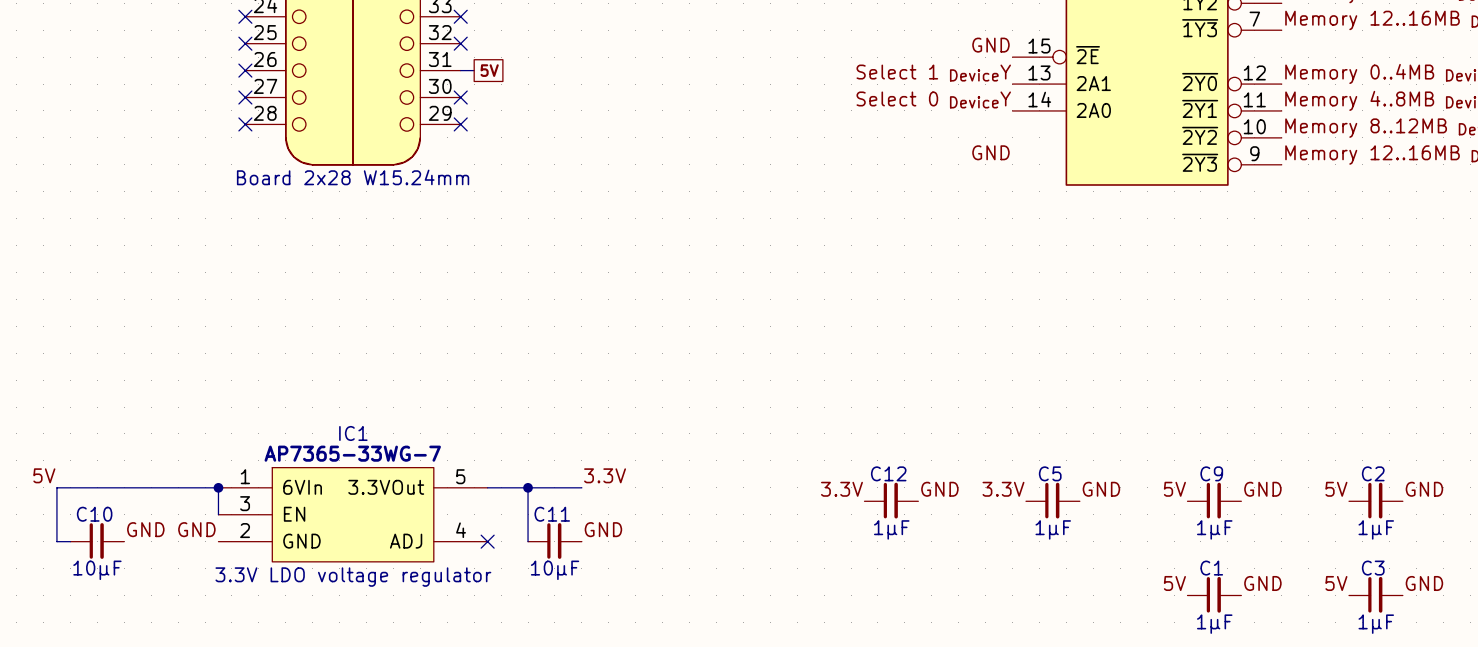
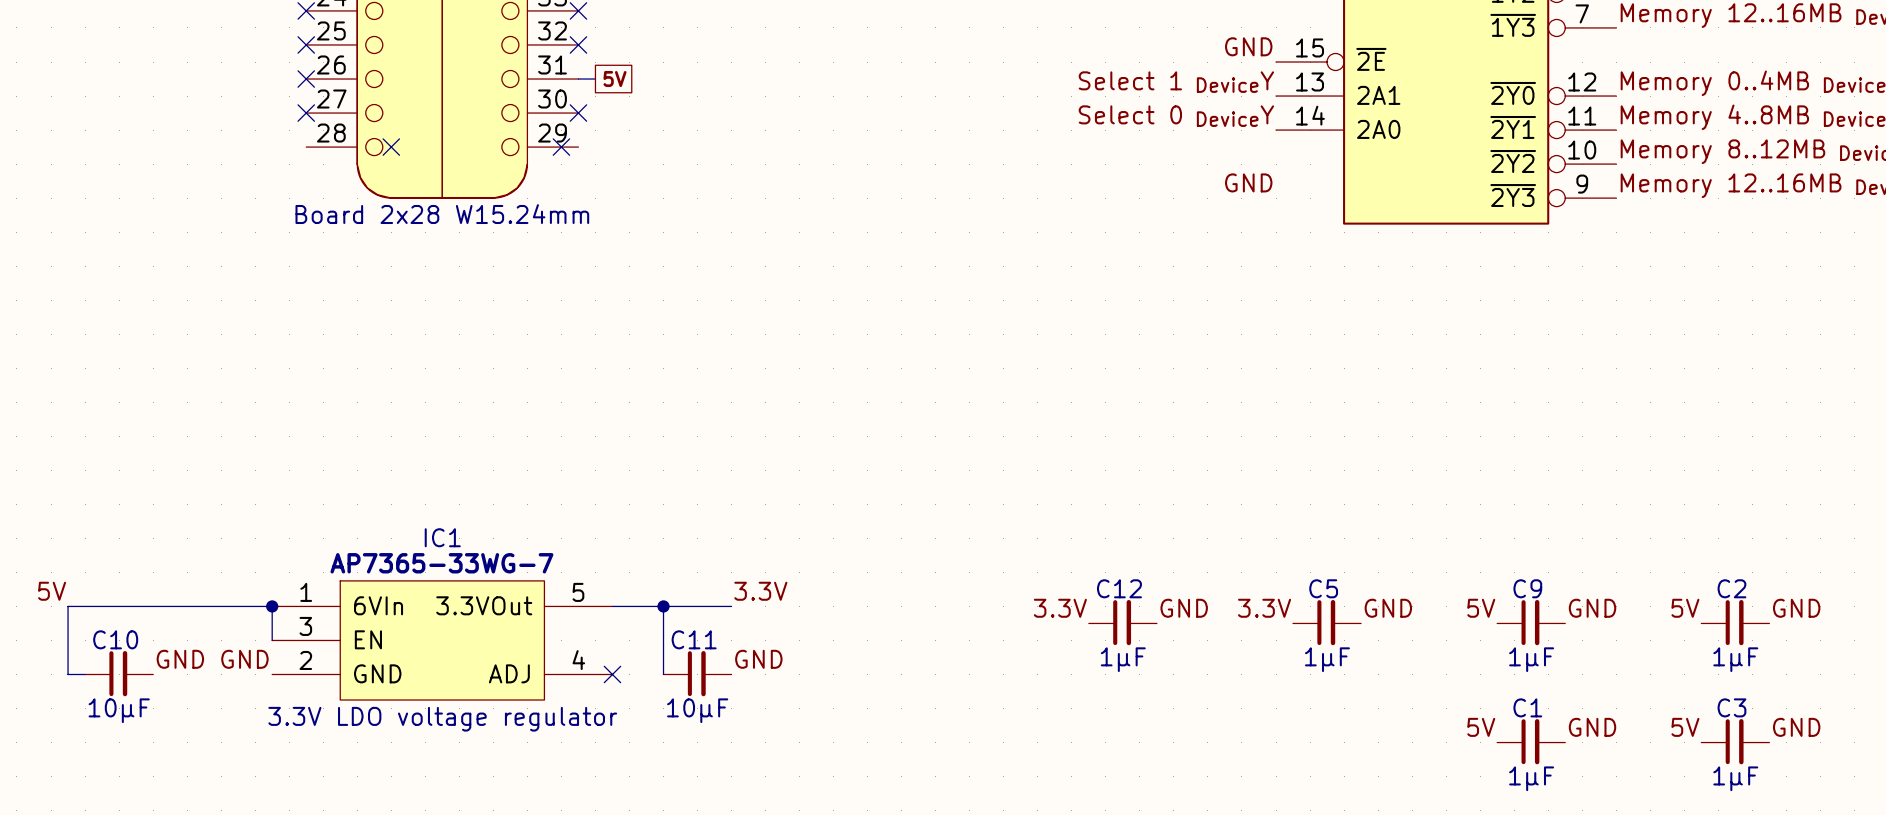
no-connect mark: (245, 124) -> none
no-connect mark: none -> (391, 147)
no-connect mark position: (460, 124) -> (561, 147)

